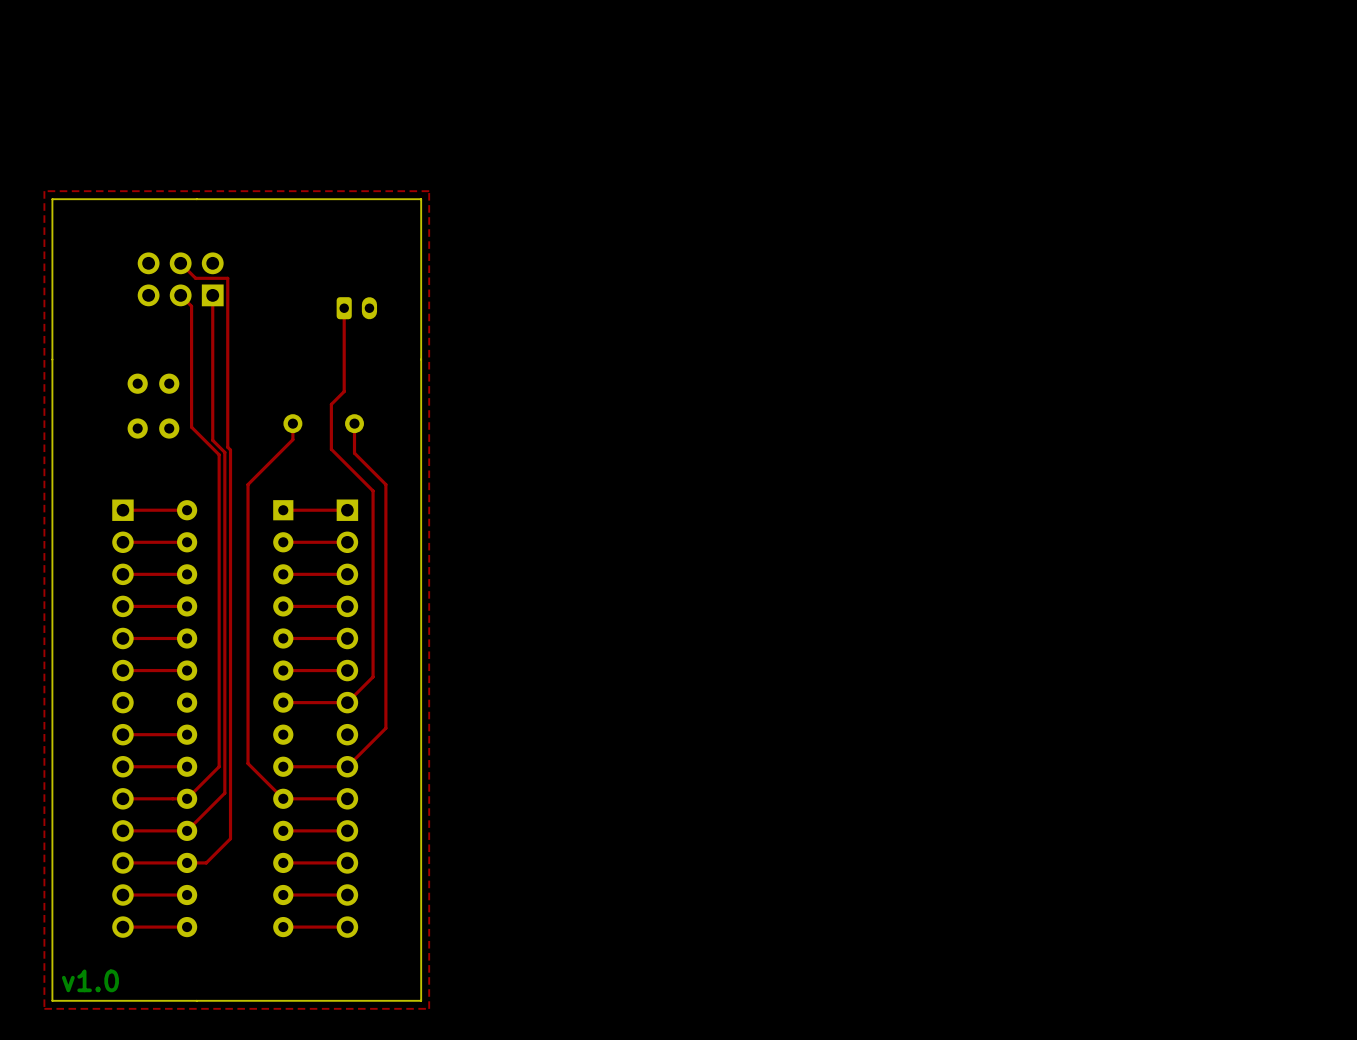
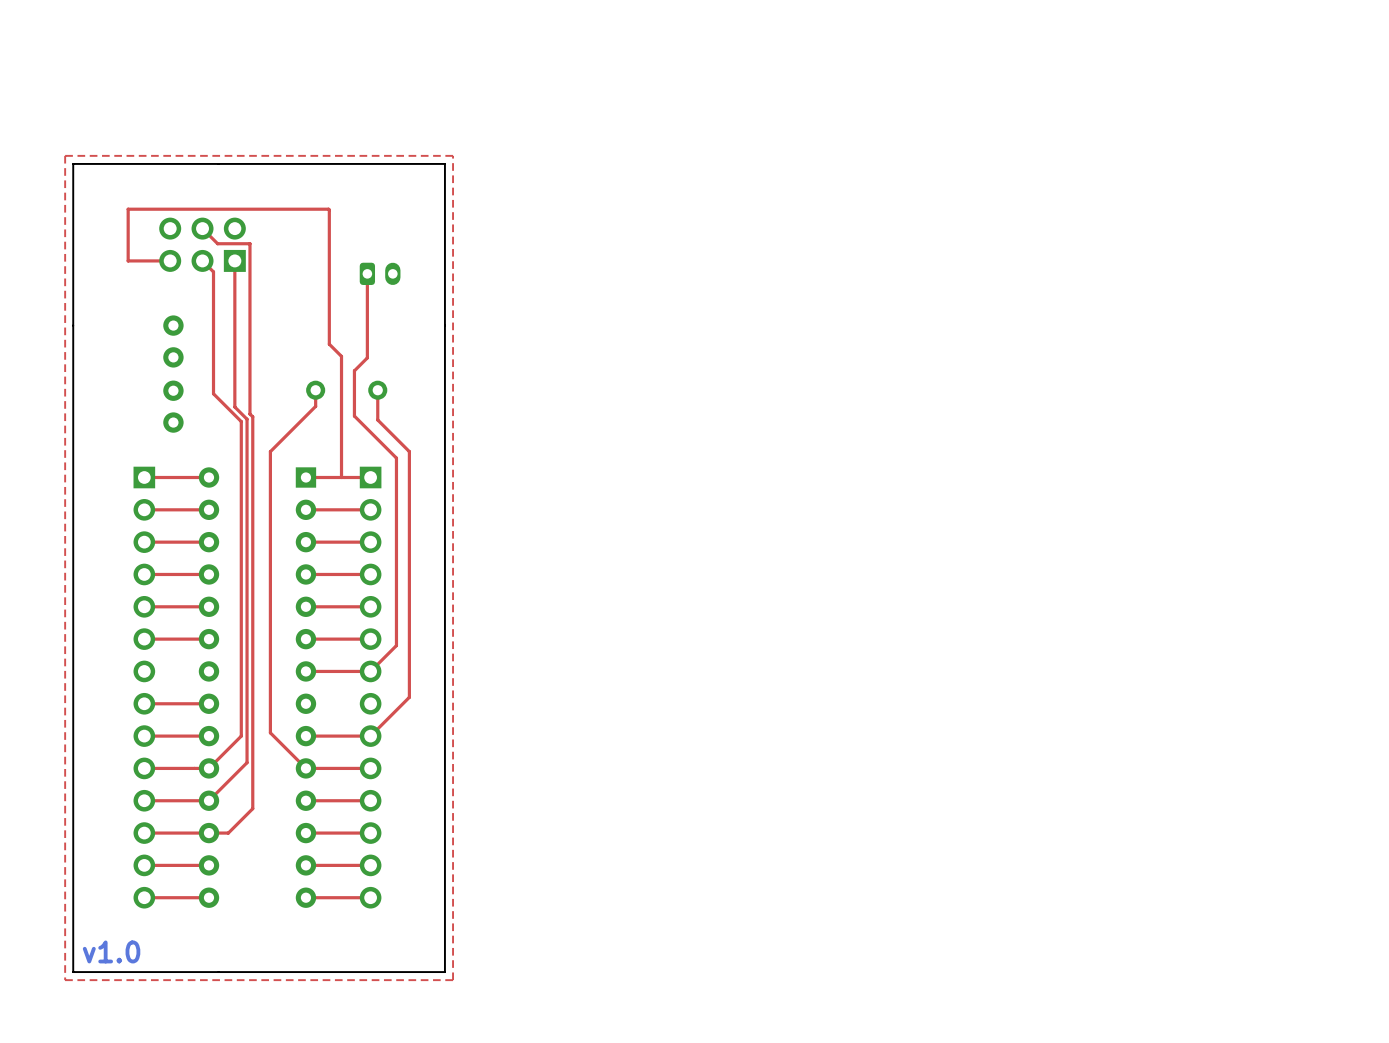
top track: none -> (170, 260) (128, 260) (128, 209) (329, 209) (329, 344) (341, 356) (341, 477)
part rotation: 0° (153, 383) -> 90° clockwise (173, 341)
part rotation: 0° (153, 428) -> 90° clockwise (173, 406)

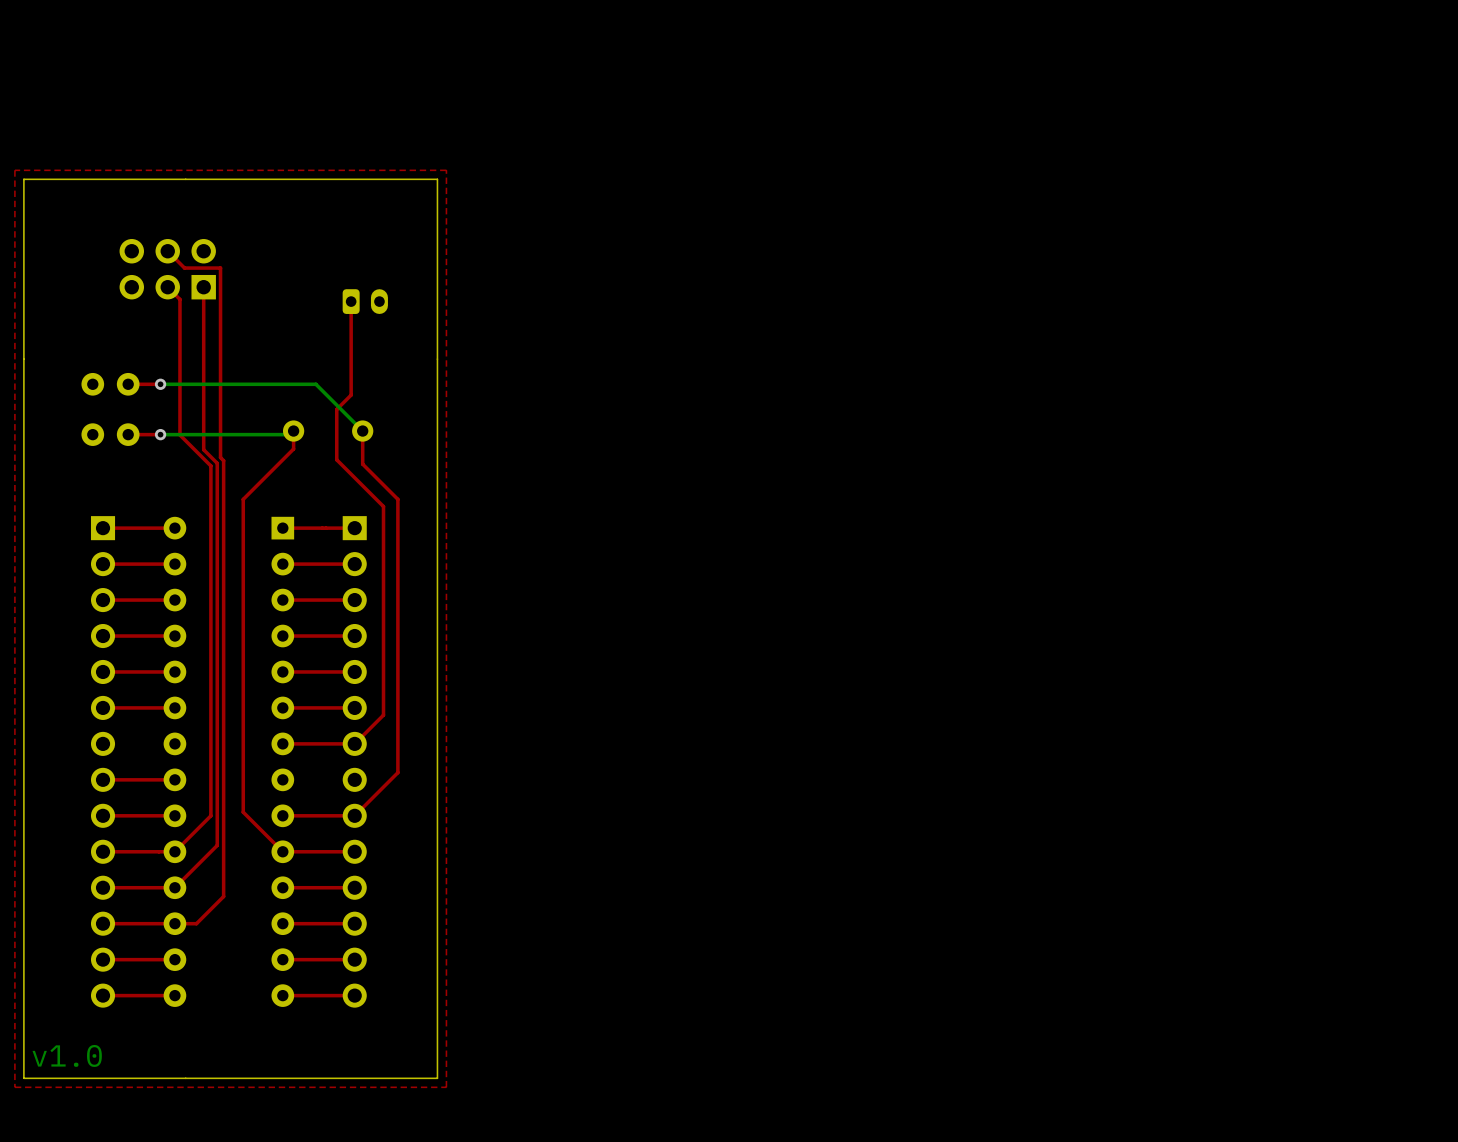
top track: (170, 260) (128, 260) (128, 209) (329, 209) (329, 344) (341, 356) (341, 477) -> none
part rotation: 0° (173, 341) -> 90° clockwise (110, 384)
top track: none -> (160, 384) (128, 384)
bottom track: none -> (160, 384) (315, 384) (362, 431)
via: none -> (160, 384)
bottom track: none -> (293, 431) (290, 434) (160, 434)
top track: none -> (160, 434) (128, 434)
via: none -> (160, 434)
part rotation: 0° (173, 406) -> 90° clockwise (110, 434)

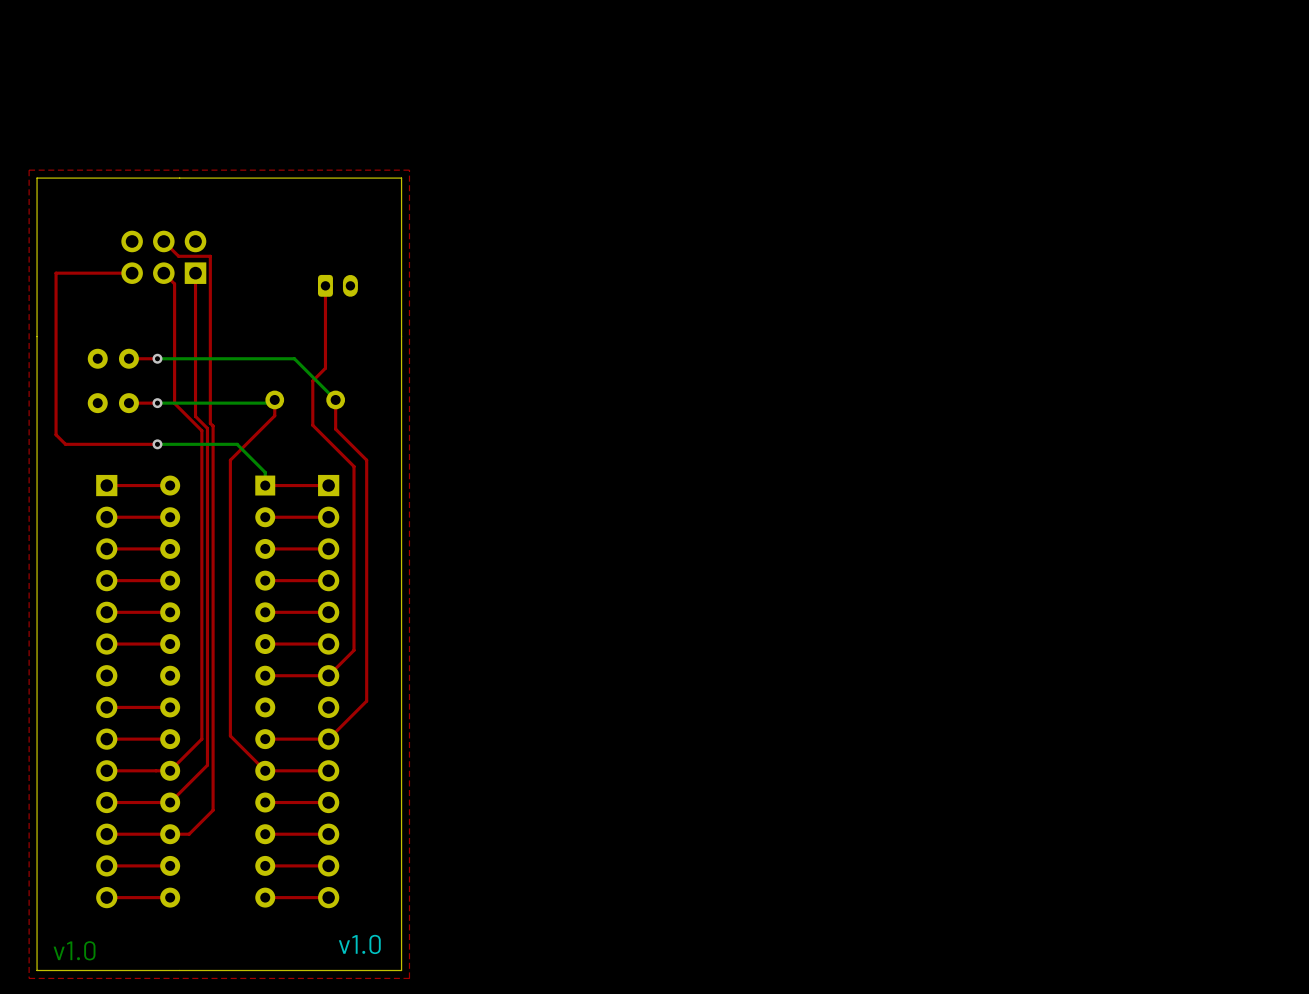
top track: none -> (132, 273) (56, 273) (56, 434) (65, 444) (157, 444)
bottom track: none -> (157, 444) (237, 444) (265, 472) (265, 485)
via: none -> (157, 444)
text: none -> v1.0 (359, 944)

